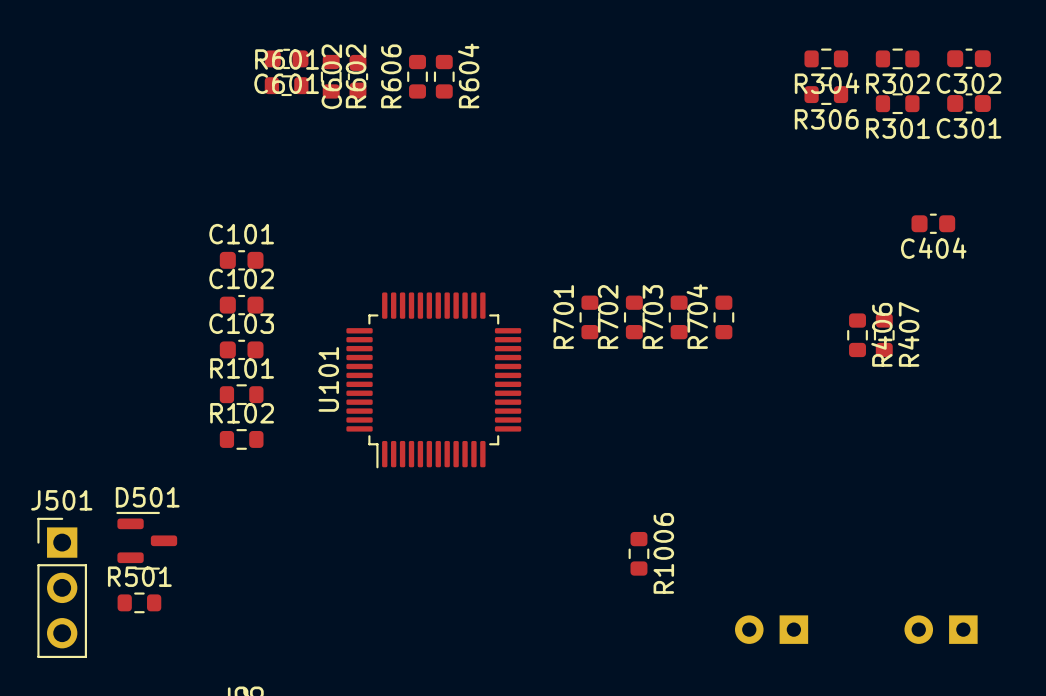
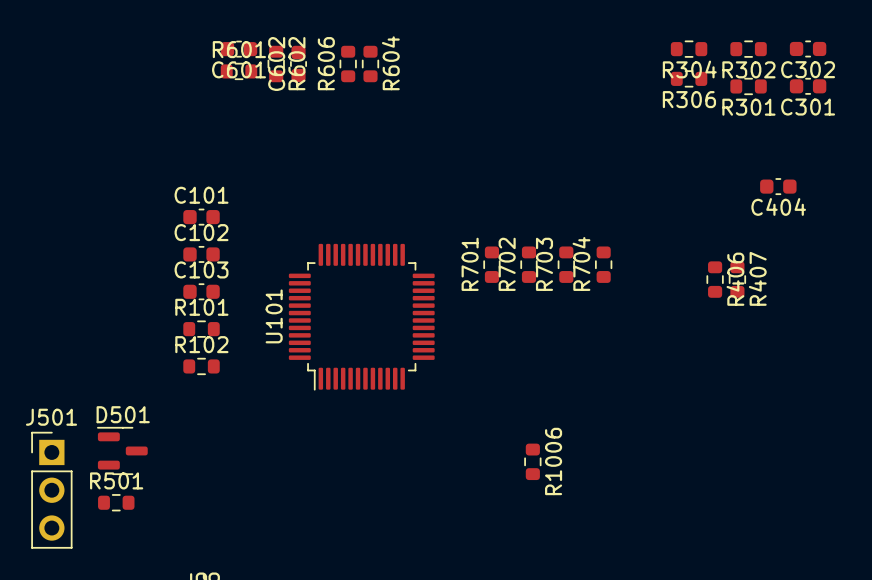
part: (771, 629) -> none
part: (941, 629) -> none

